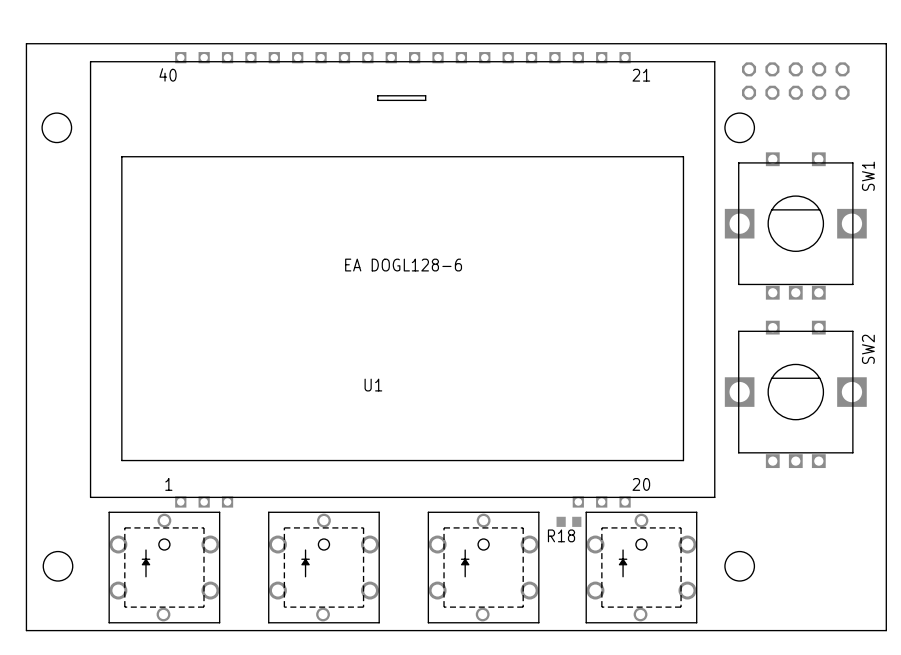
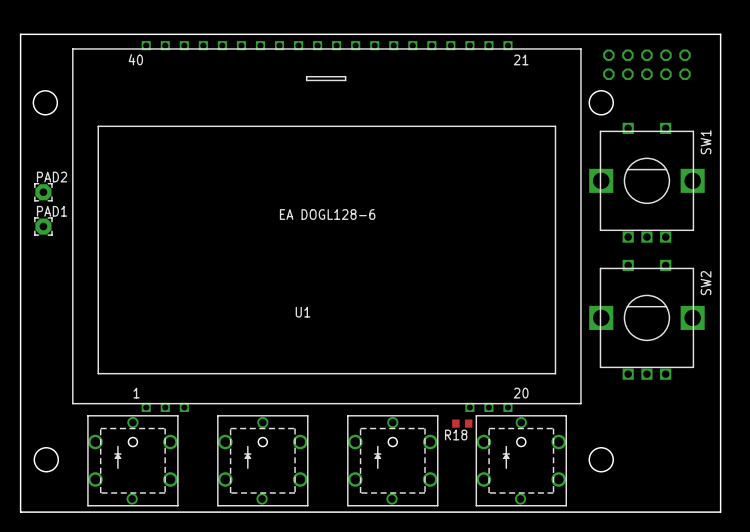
PAD2: none -> (43, 192)
PAD1: none -> (43, 226)

